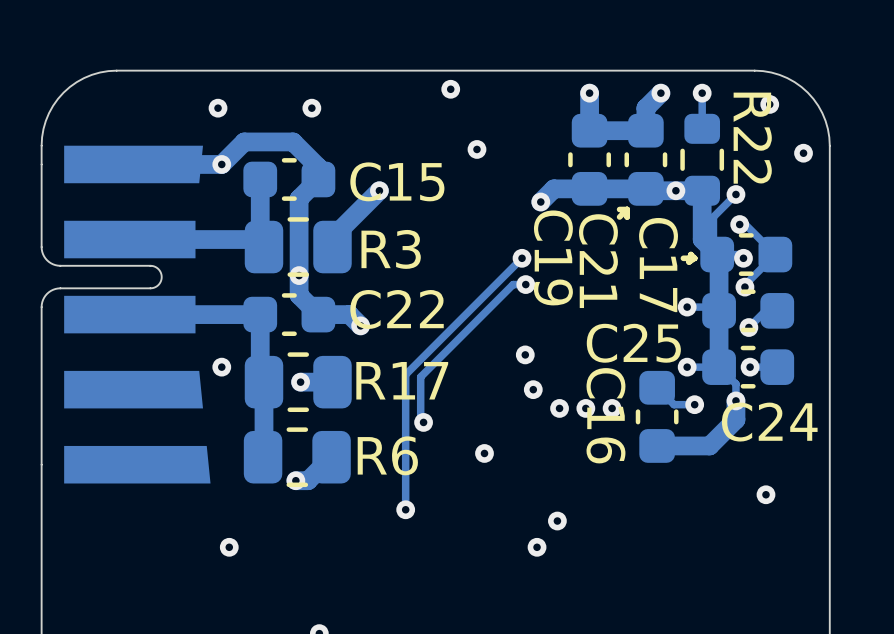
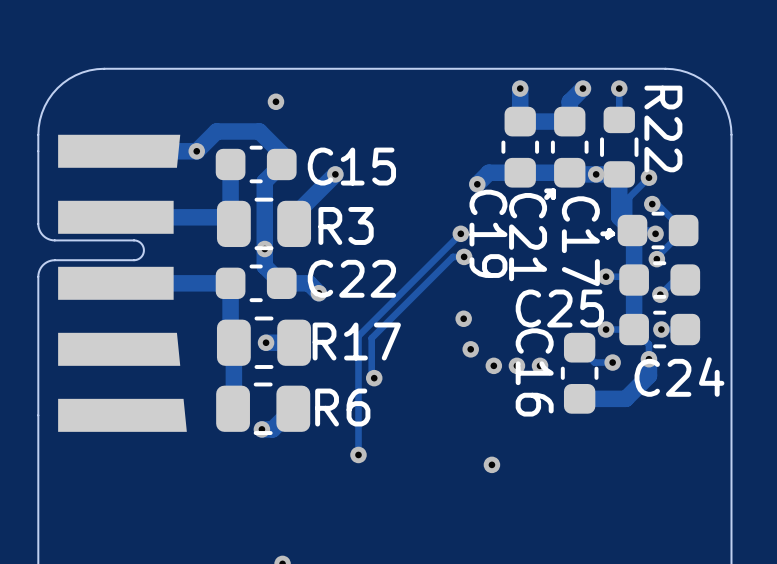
via: (450, 89) -> none
via: (769, 104) -> none
via: (218, 108) -> none
via: (476, 149) -> none
via: (803, 153) -> none
via: (221, 367) -> none
via: (484, 453) -> none
via: (765, 494) -> none
via: (229, 547) -> none
via: (537, 547) -> none

